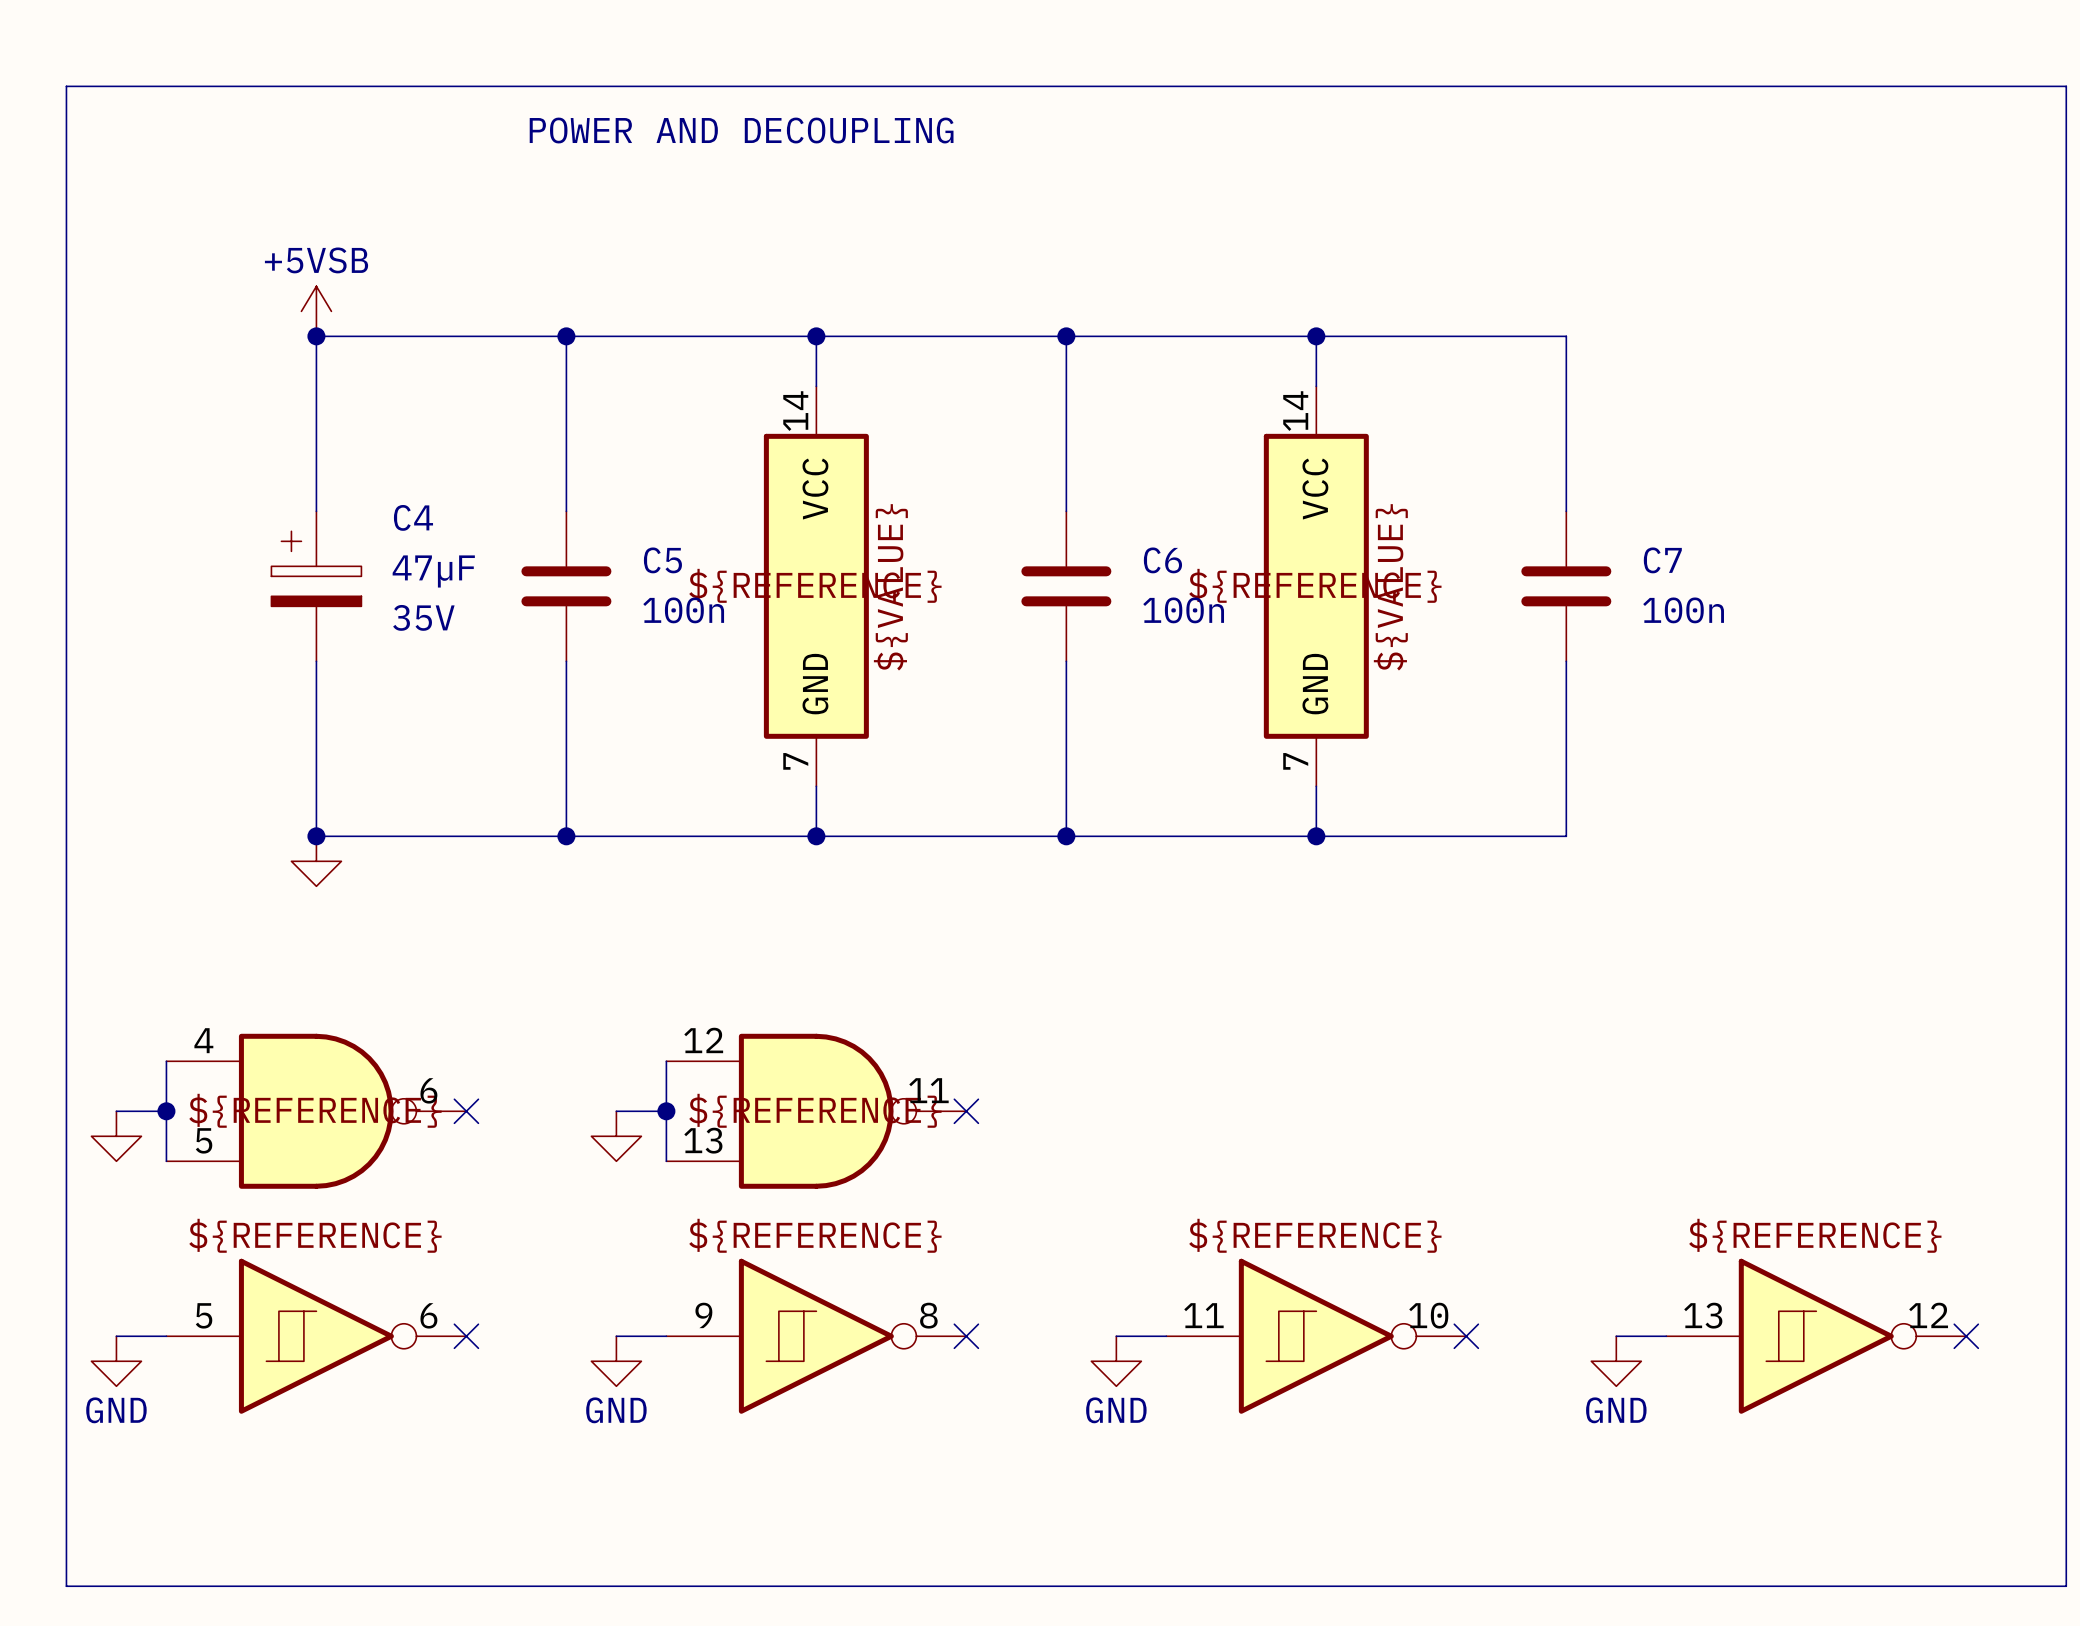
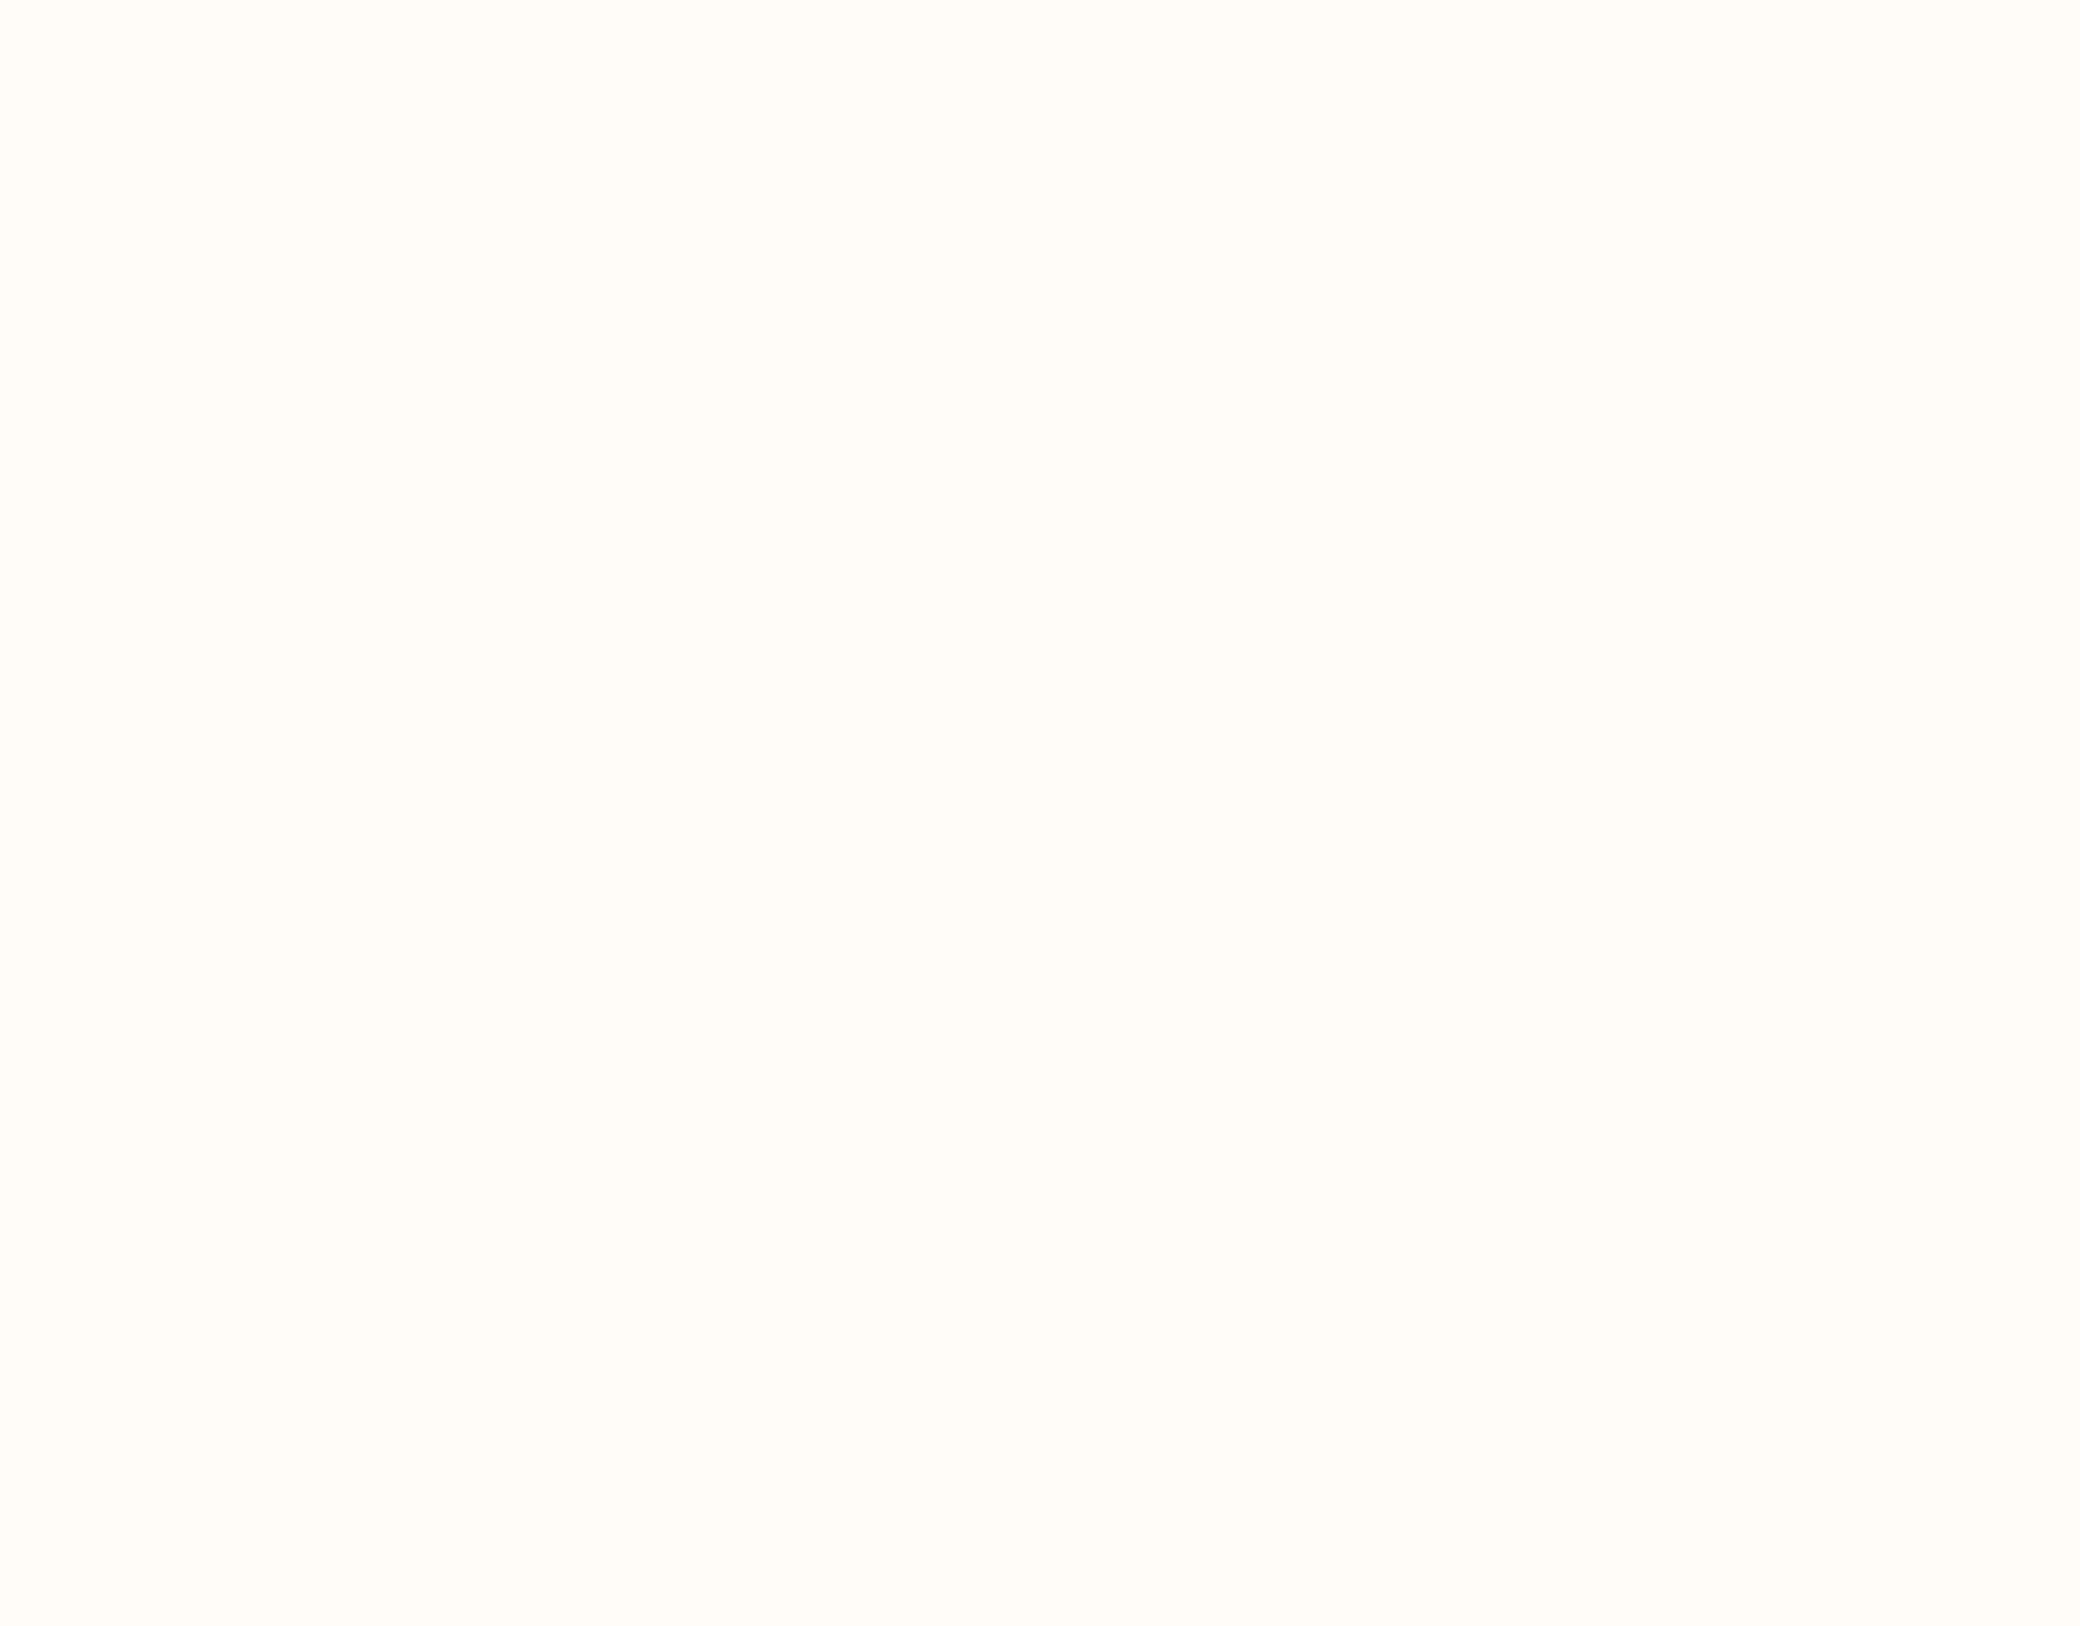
line: (66, 86) (2066, 86) (2066, 1586) (66, 1586) (66, 86) -> none
text: POWER AND DECOUPLING (741, 130) -> none
power symbol: +5VSB (316, 311) -> none
junction: (316, 336) -> none
wire: (566, 336) (566, 511) -> none
junction: (566, 336) -> none
wire: (816, 336) (816, 386) -> none
junction: (816, 336) -> none
wire: (1066, 336) (1066, 511) -> none
junction: (1066, 336) -> none
wire: (1316, 336) (1316, 386) -> none
junction: (1316, 336) -> none
wire: (316, 511) (316, 336) (1566, 336) (1566, 511) -> none
C4: 47µF (316, 586) -> none
C5: 100n (566, 586) -> none
part: (816, 586) -> none
C6: 100n (1066, 586) -> none
part: (1316, 586) -> none
C7: 100n (1566, 586) -> none
wire: (316, 661) (316, 836) (1566, 836) (1566, 661) -> none
wire: (566, 661) (566, 836) -> none
wire: (1066, 661) (1066, 836) -> none
wire: (816, 786) (816, 836) -> none
wire: (1316, 786) (1316, 836) -> none
junction: (316, 836) -> none
junction: (566, 836) -> none
junction: (816, 836) -> none
junction: (1066, 836) -> none
junction: (1316, 836) -> none
power symbol: (316, 861) -> none
wire: (166, 1061) (166, 1161) -> none
wire: (666, 1061) (666, 1161) -> none
wire: (116, 1111) (166, 1111) -> none
junction: (166, 1111) -> none
part: (316, 1111) -> none
no-connect mark: (466, 1111) -> none
wire: (616, 1111) (666, 1111) -> none
junction: (666, 1111) -> none
part: (816, 1111) -> none
no-connect mark: (966, 1111) -> none
power symbol: (116, 1136) -> none
power symbol: (616, 1136) -> none
wire: (116, 1336) (166, 1336) -> none
part: (316, 1336) -> none
no-connect mark: (466, 1336) -> none
wire: (616, 1336) (666, 1336) -> none
part: (816, 1336) -> none
no-connect mark: (966, 1336) -> none
wire: (1116, 1336) (1166, 1336) -> none
part: (1316, 1336) -> none
no-connect mark: (1466, 1336) -> none
wire: (1616, 1336) (1666, 1336) -> none
part: (1816, 1336) -> none
no-connect mark: (1966, 1336) -> none
power symbol: GND (116, 1361) -> none
power symbol: GND (616, 1361) -> none
power symbol: GND (1116, 1361) -> none
power symbol: GND (1616, 1361) -> none

